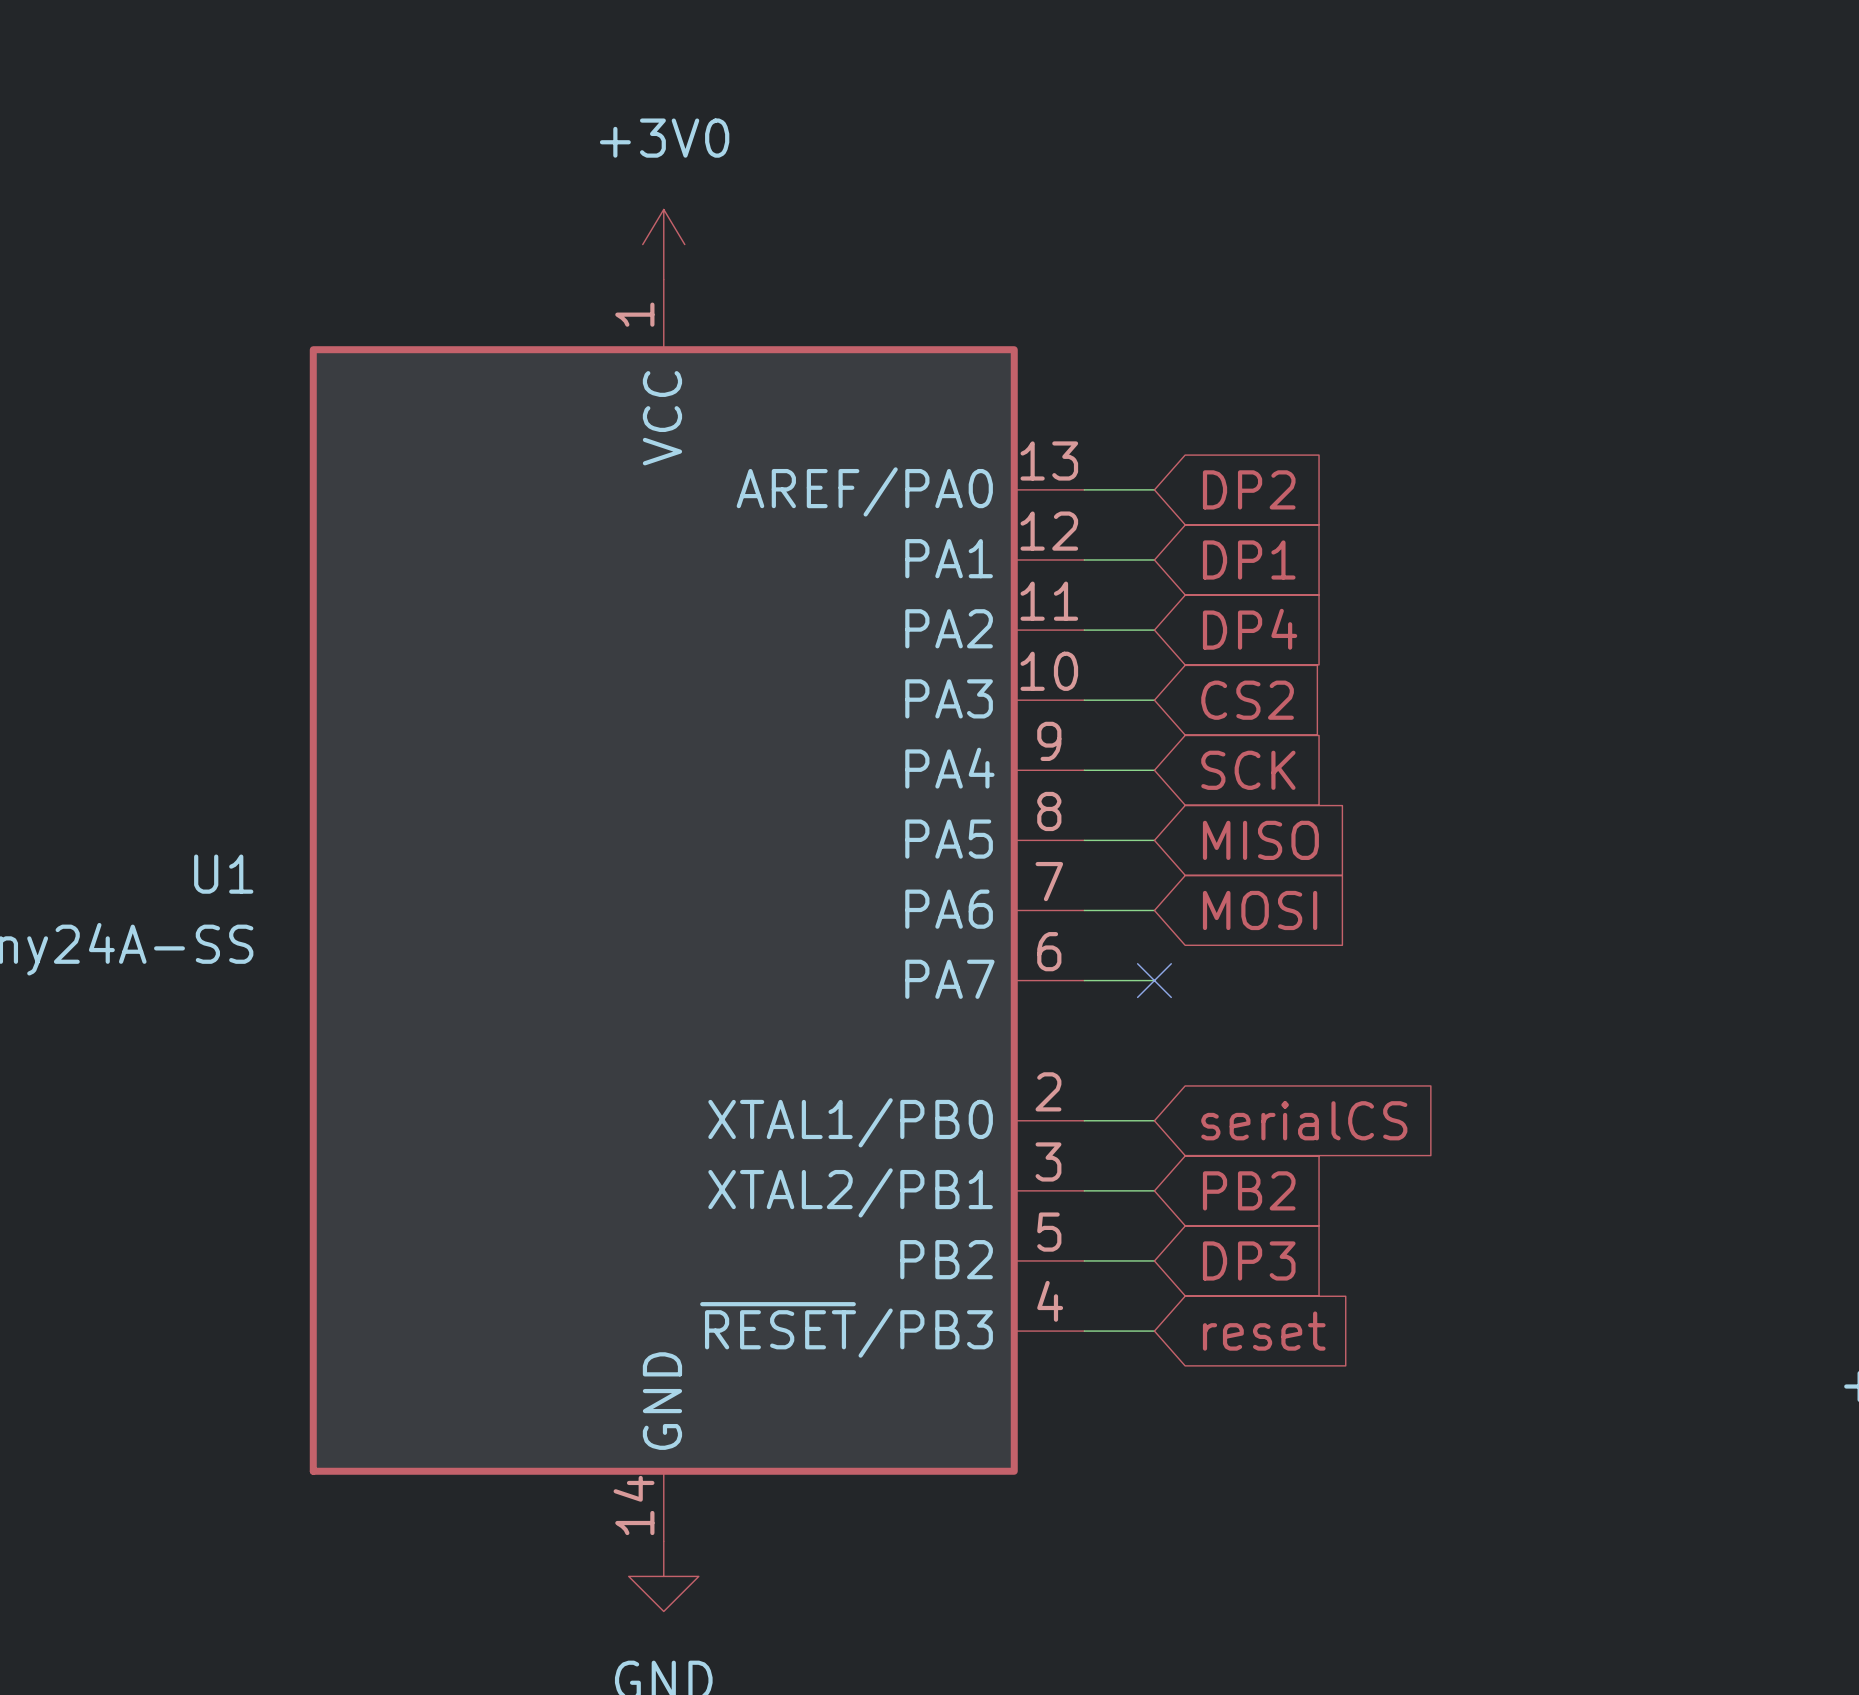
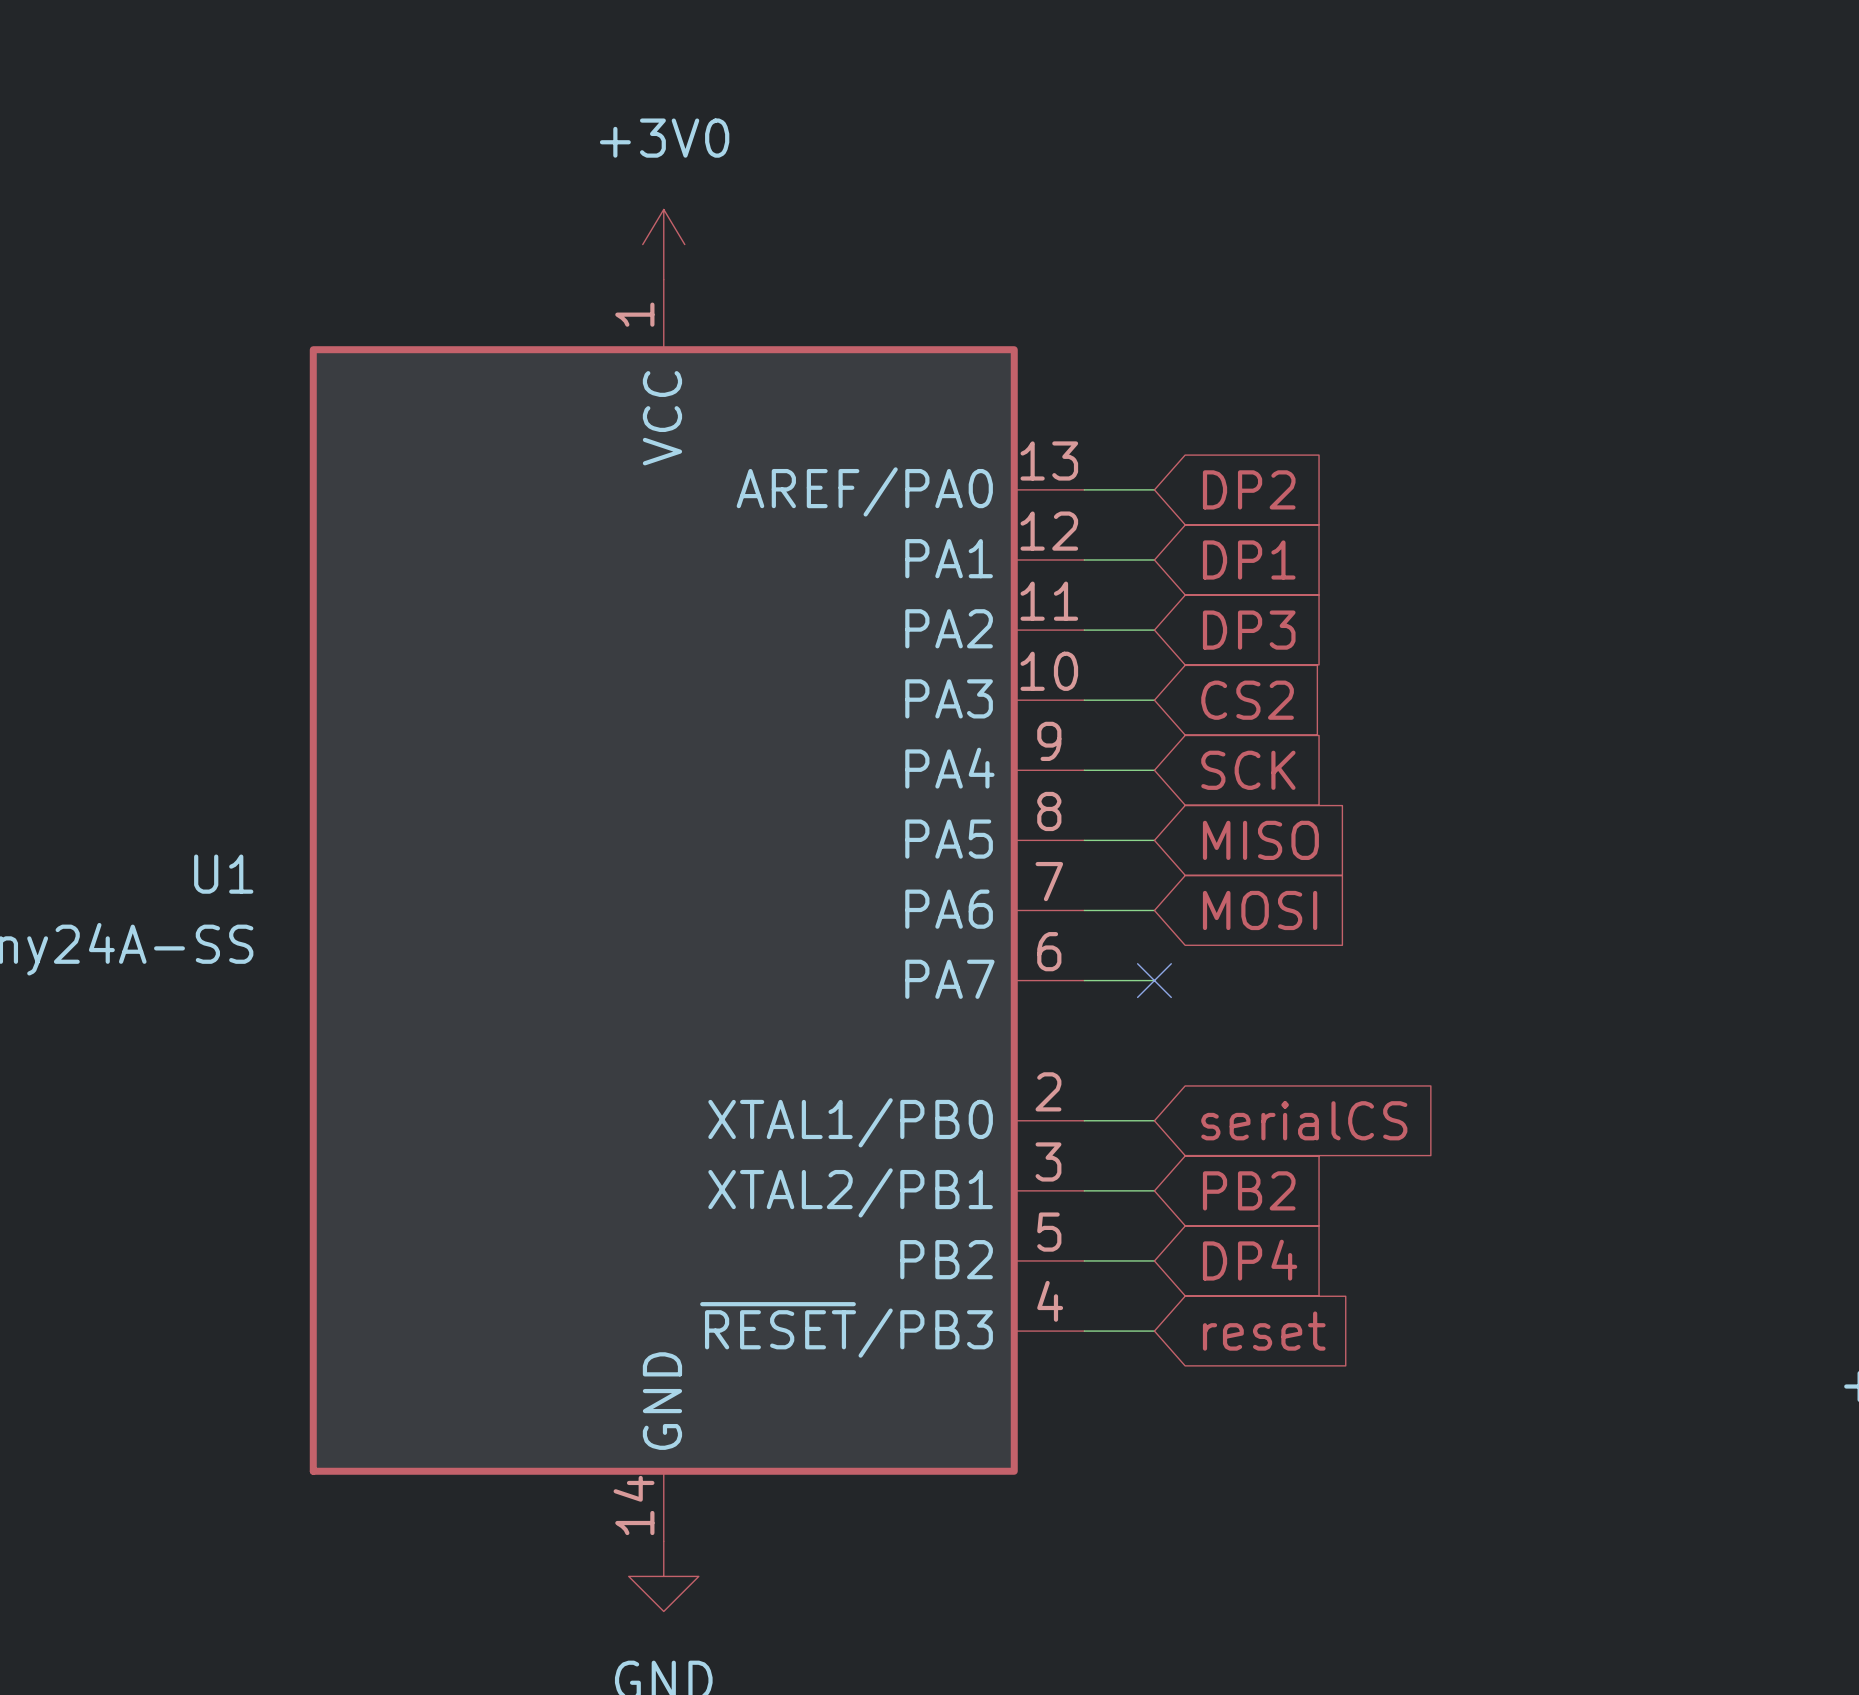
global label: DP4 (1250, 629) -> DP3 (1249, 630)
global label: DP3 (1249, 1260) -> DP4 (1250, 1260)

